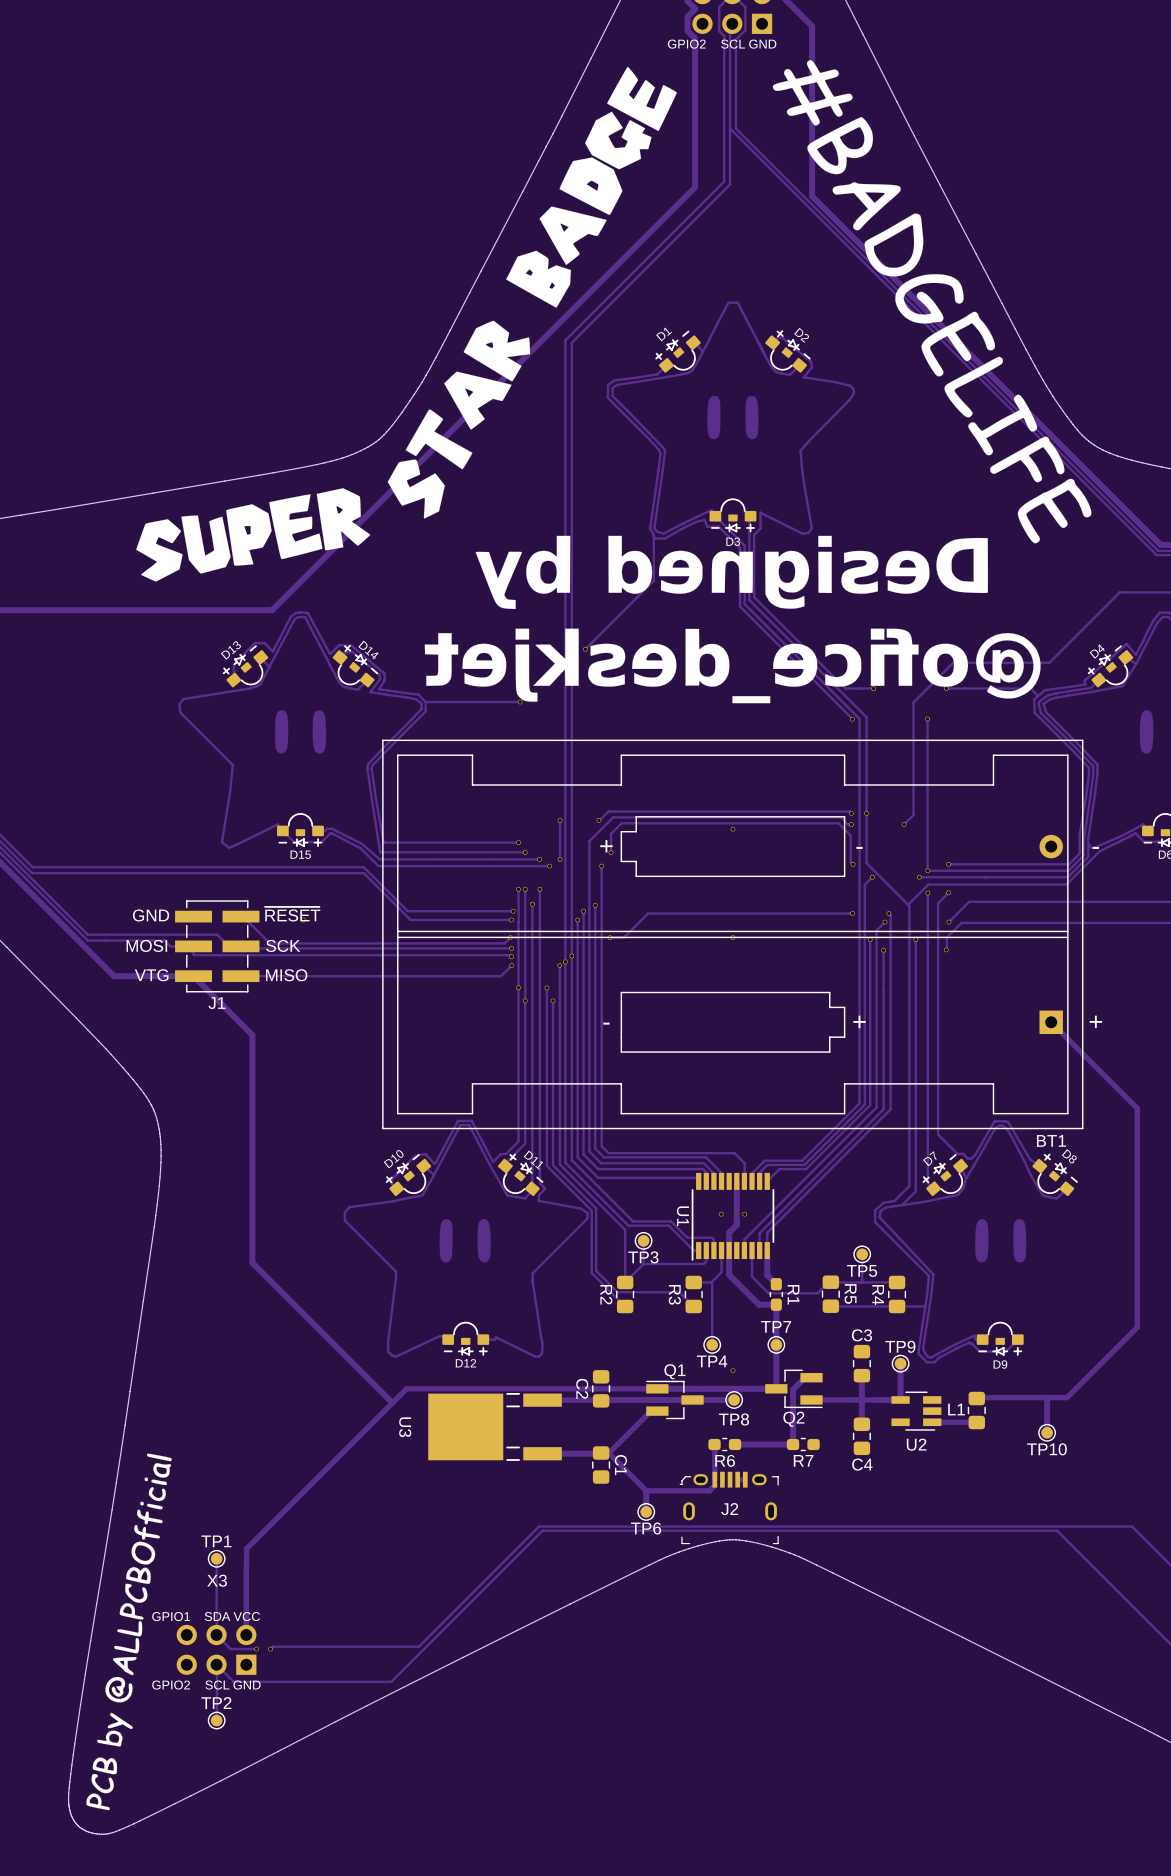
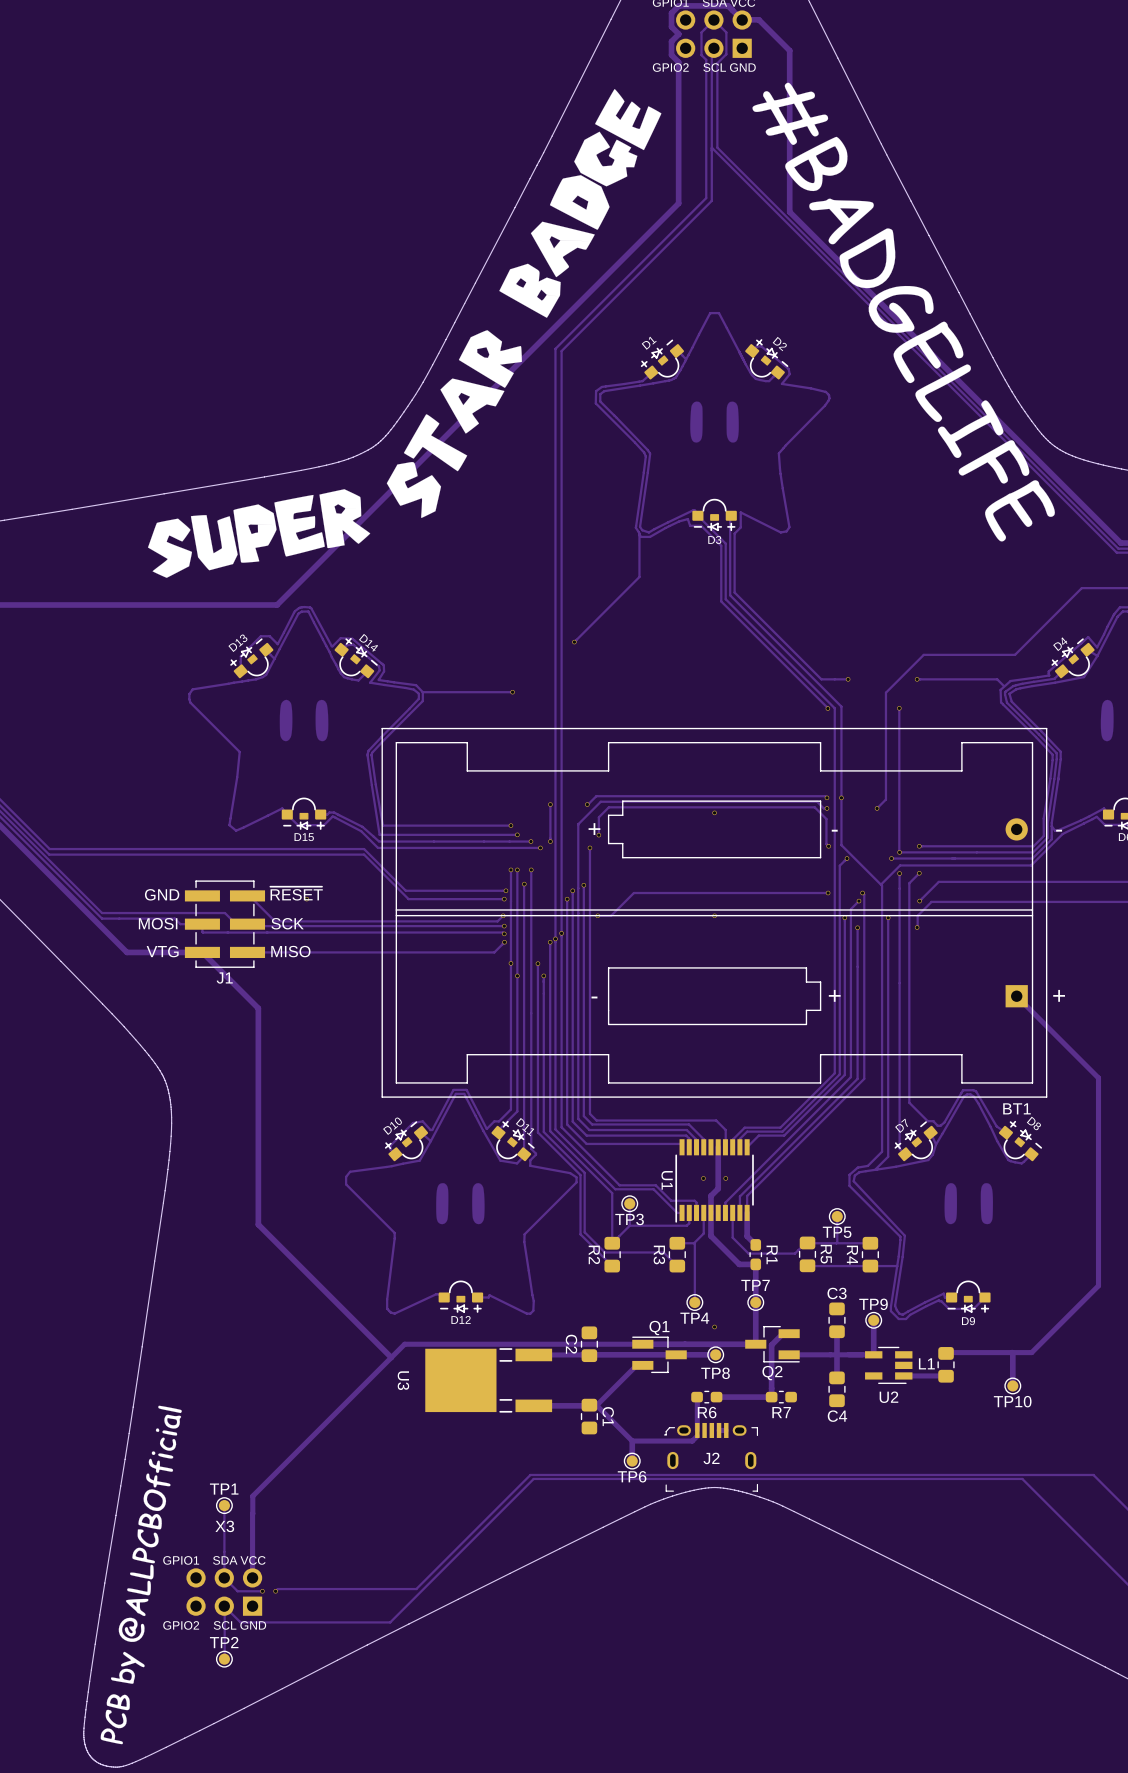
drawing shape: [86, 60, 1092, 1811] -> [100, 82, 1055, 1745]

